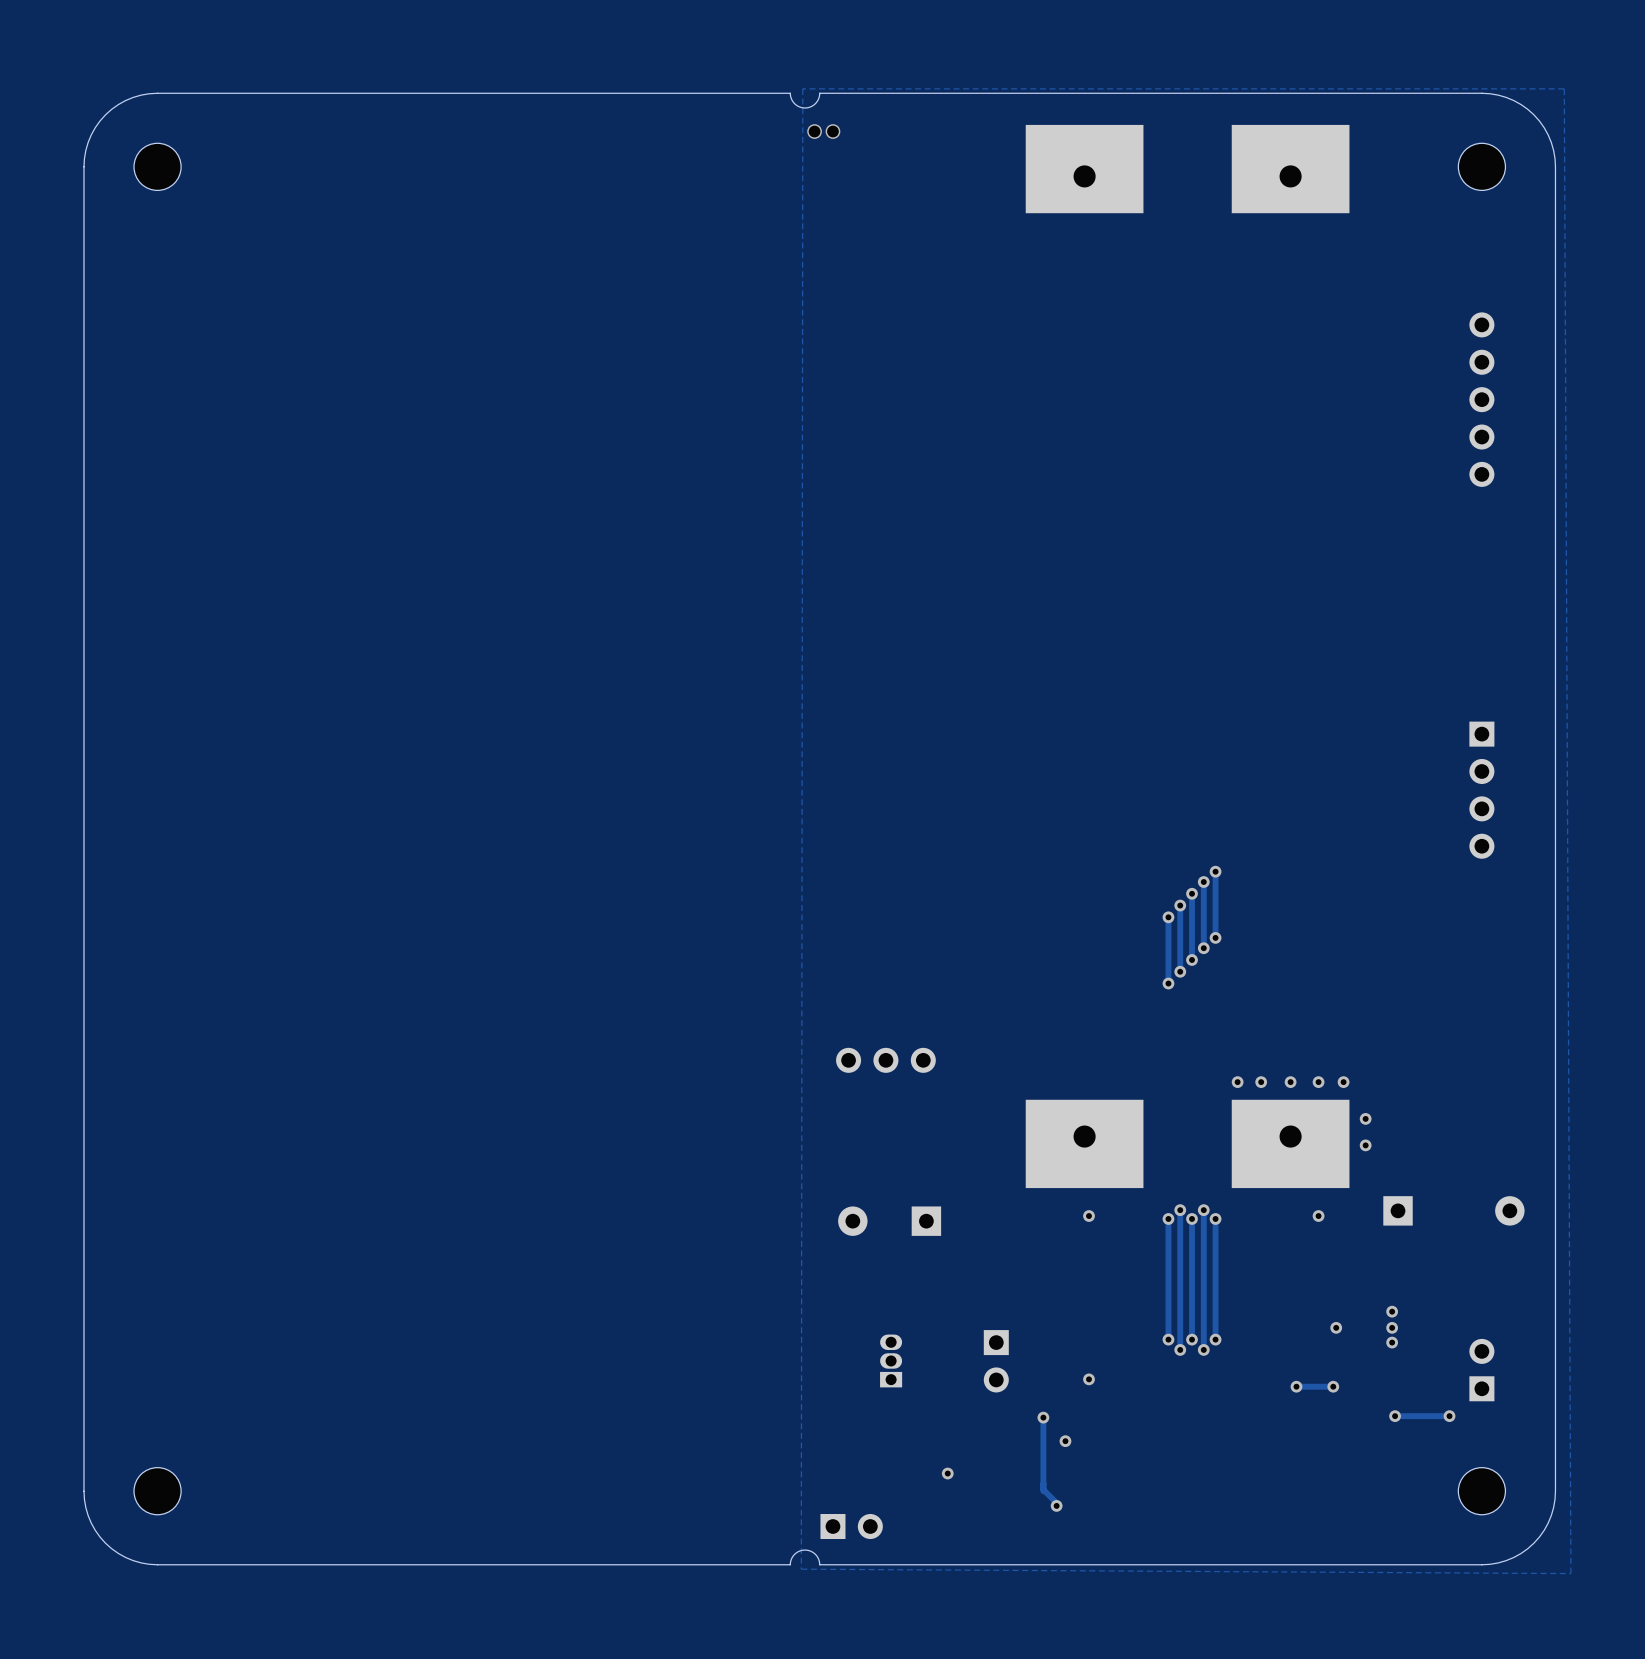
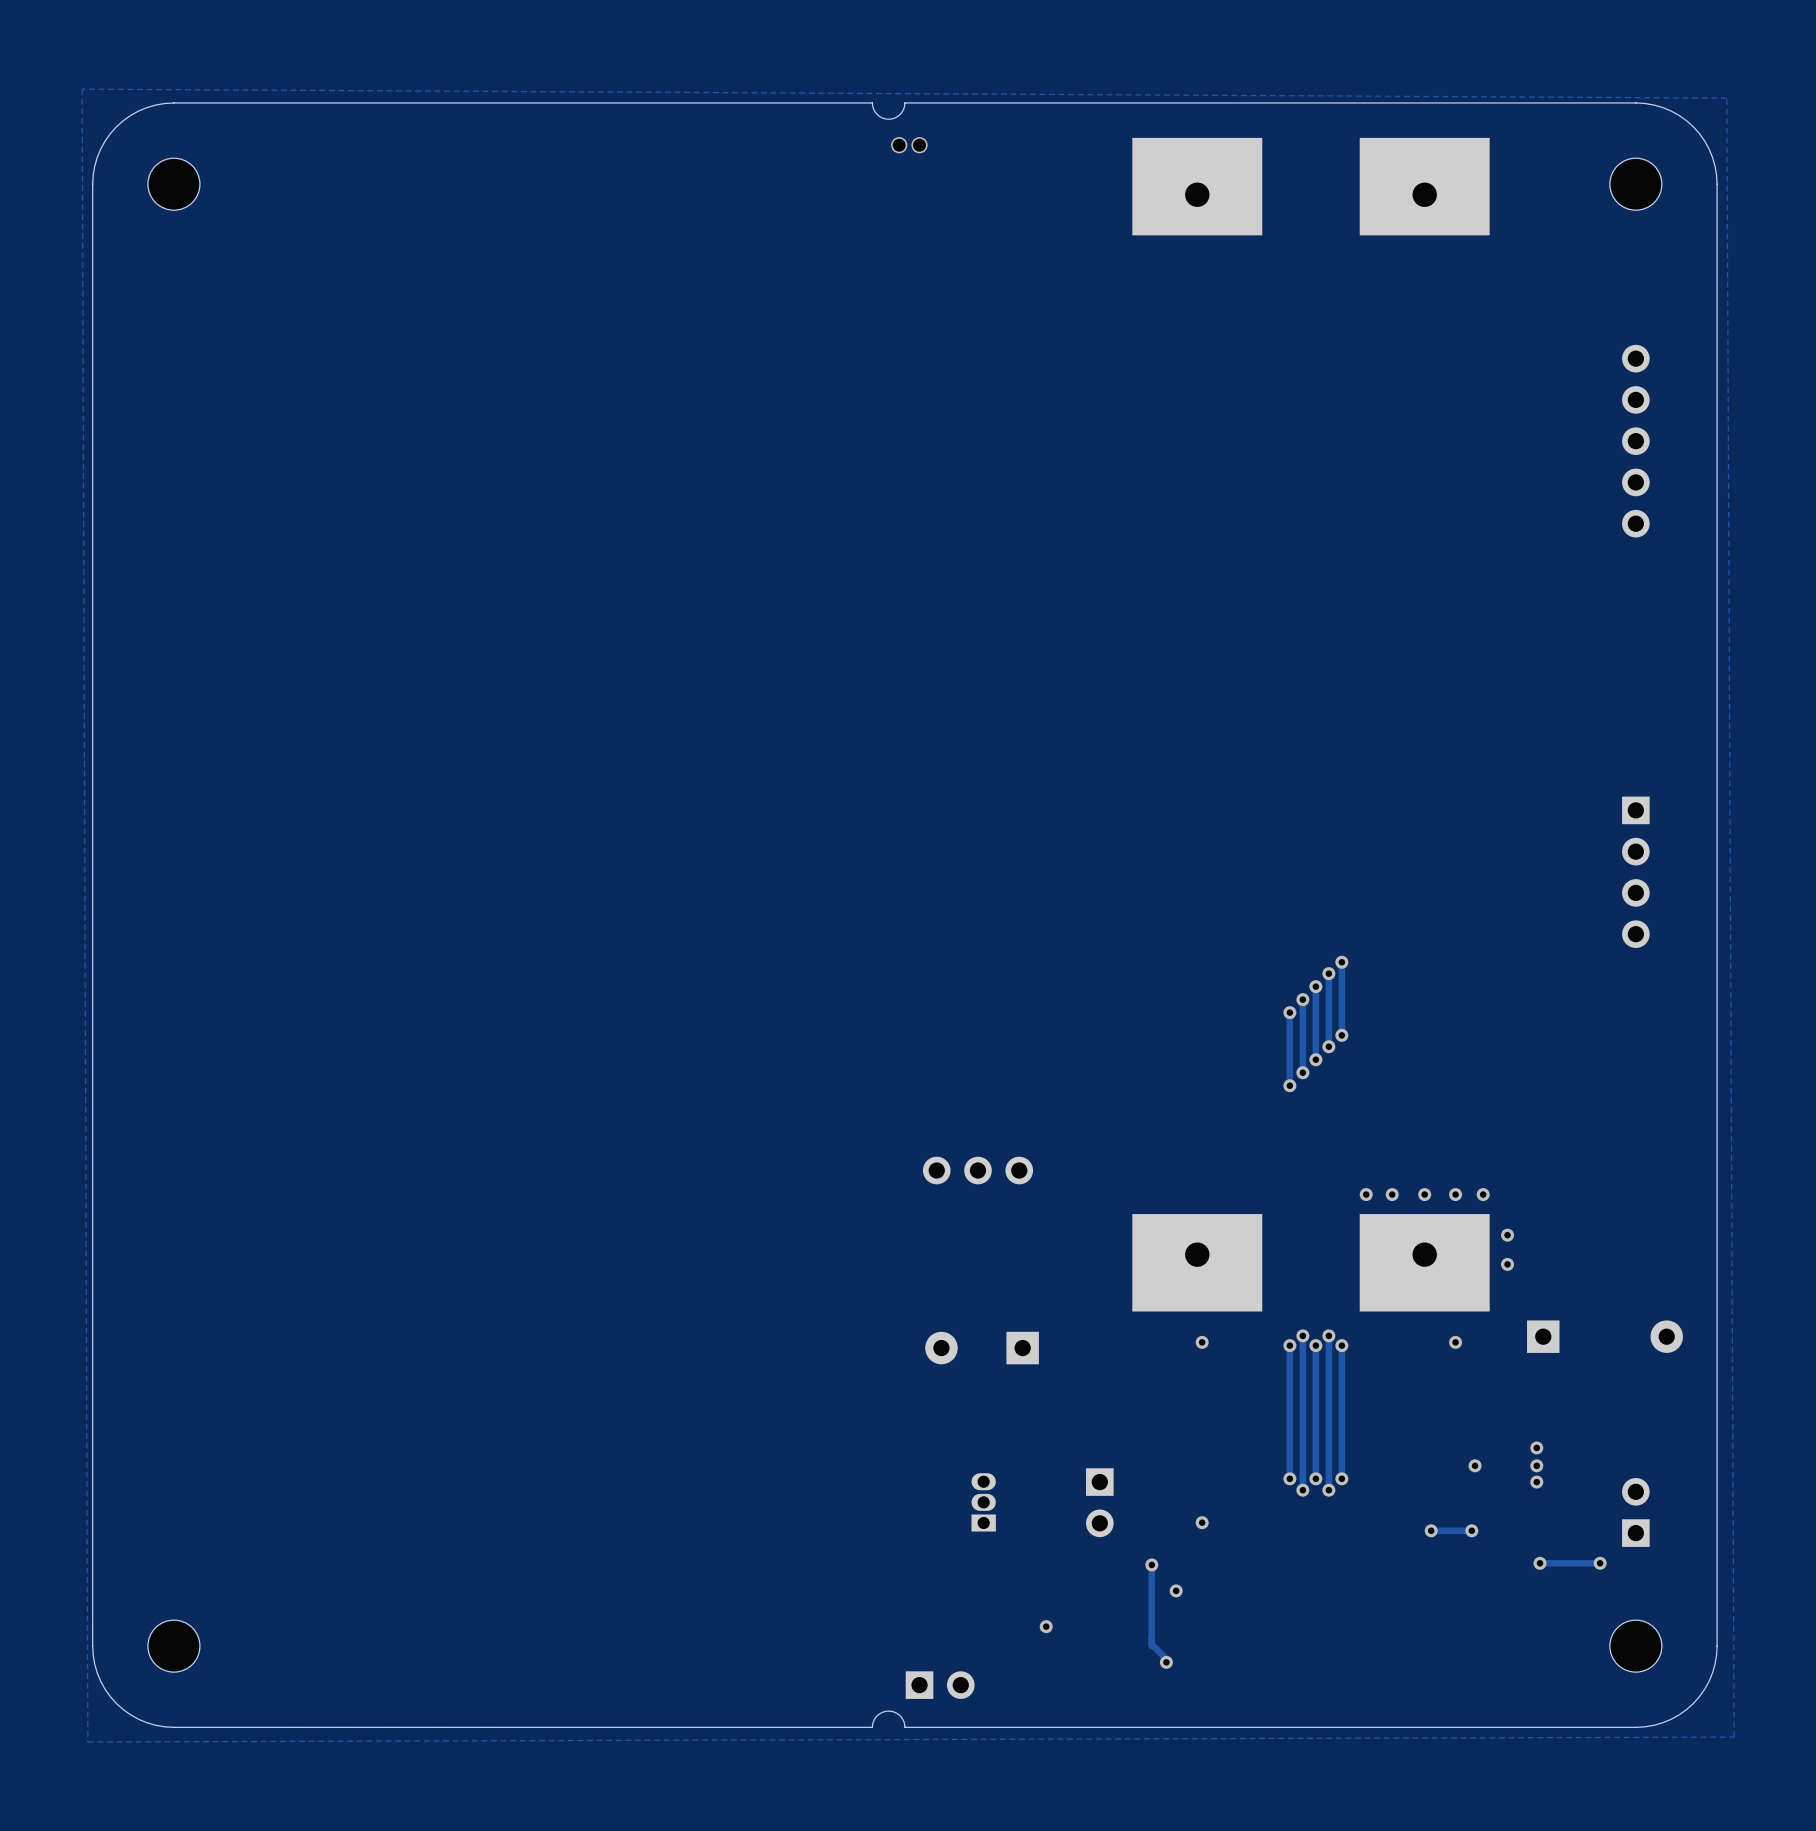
zone outline: (1564, 88) (802, 88) (801, 1569) (1570, 1573) -> (1726, 98) (82, 89) (87, 1741) (1734, 1737)

